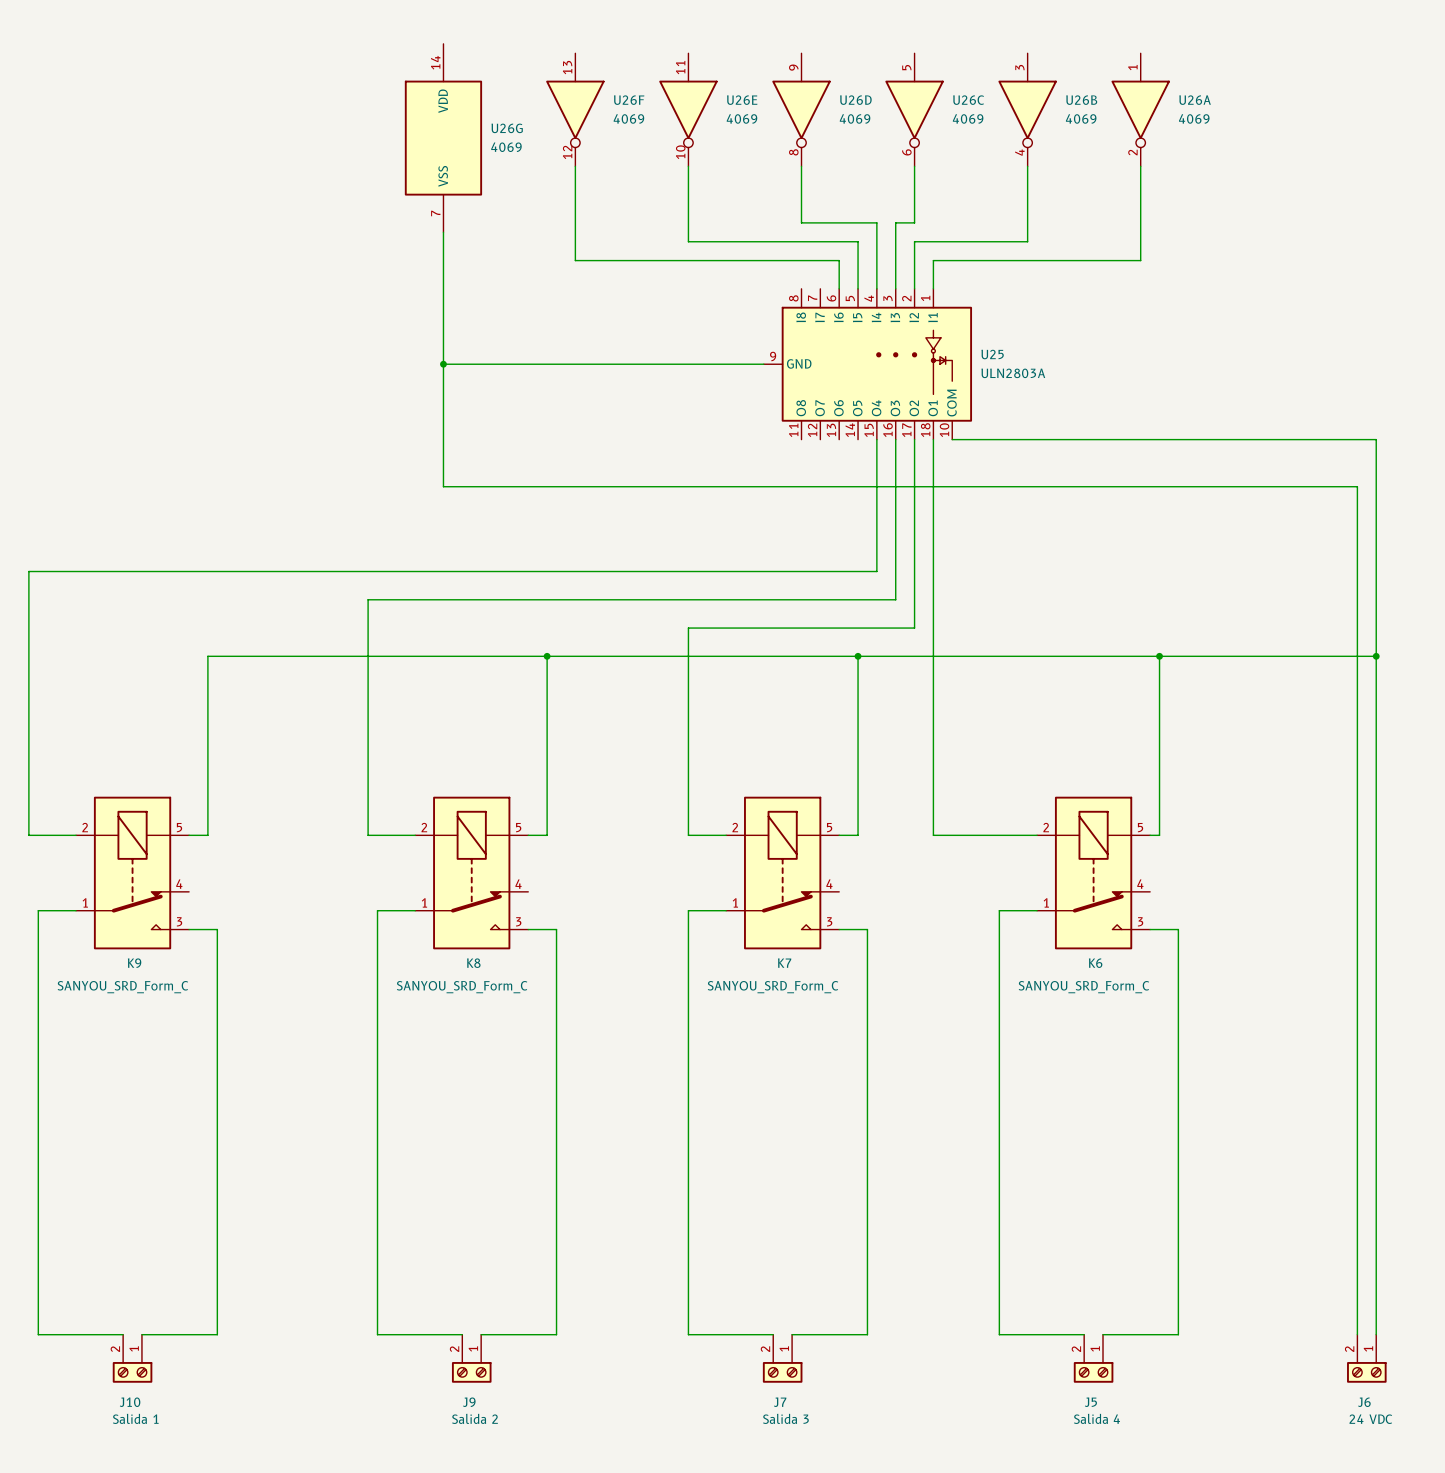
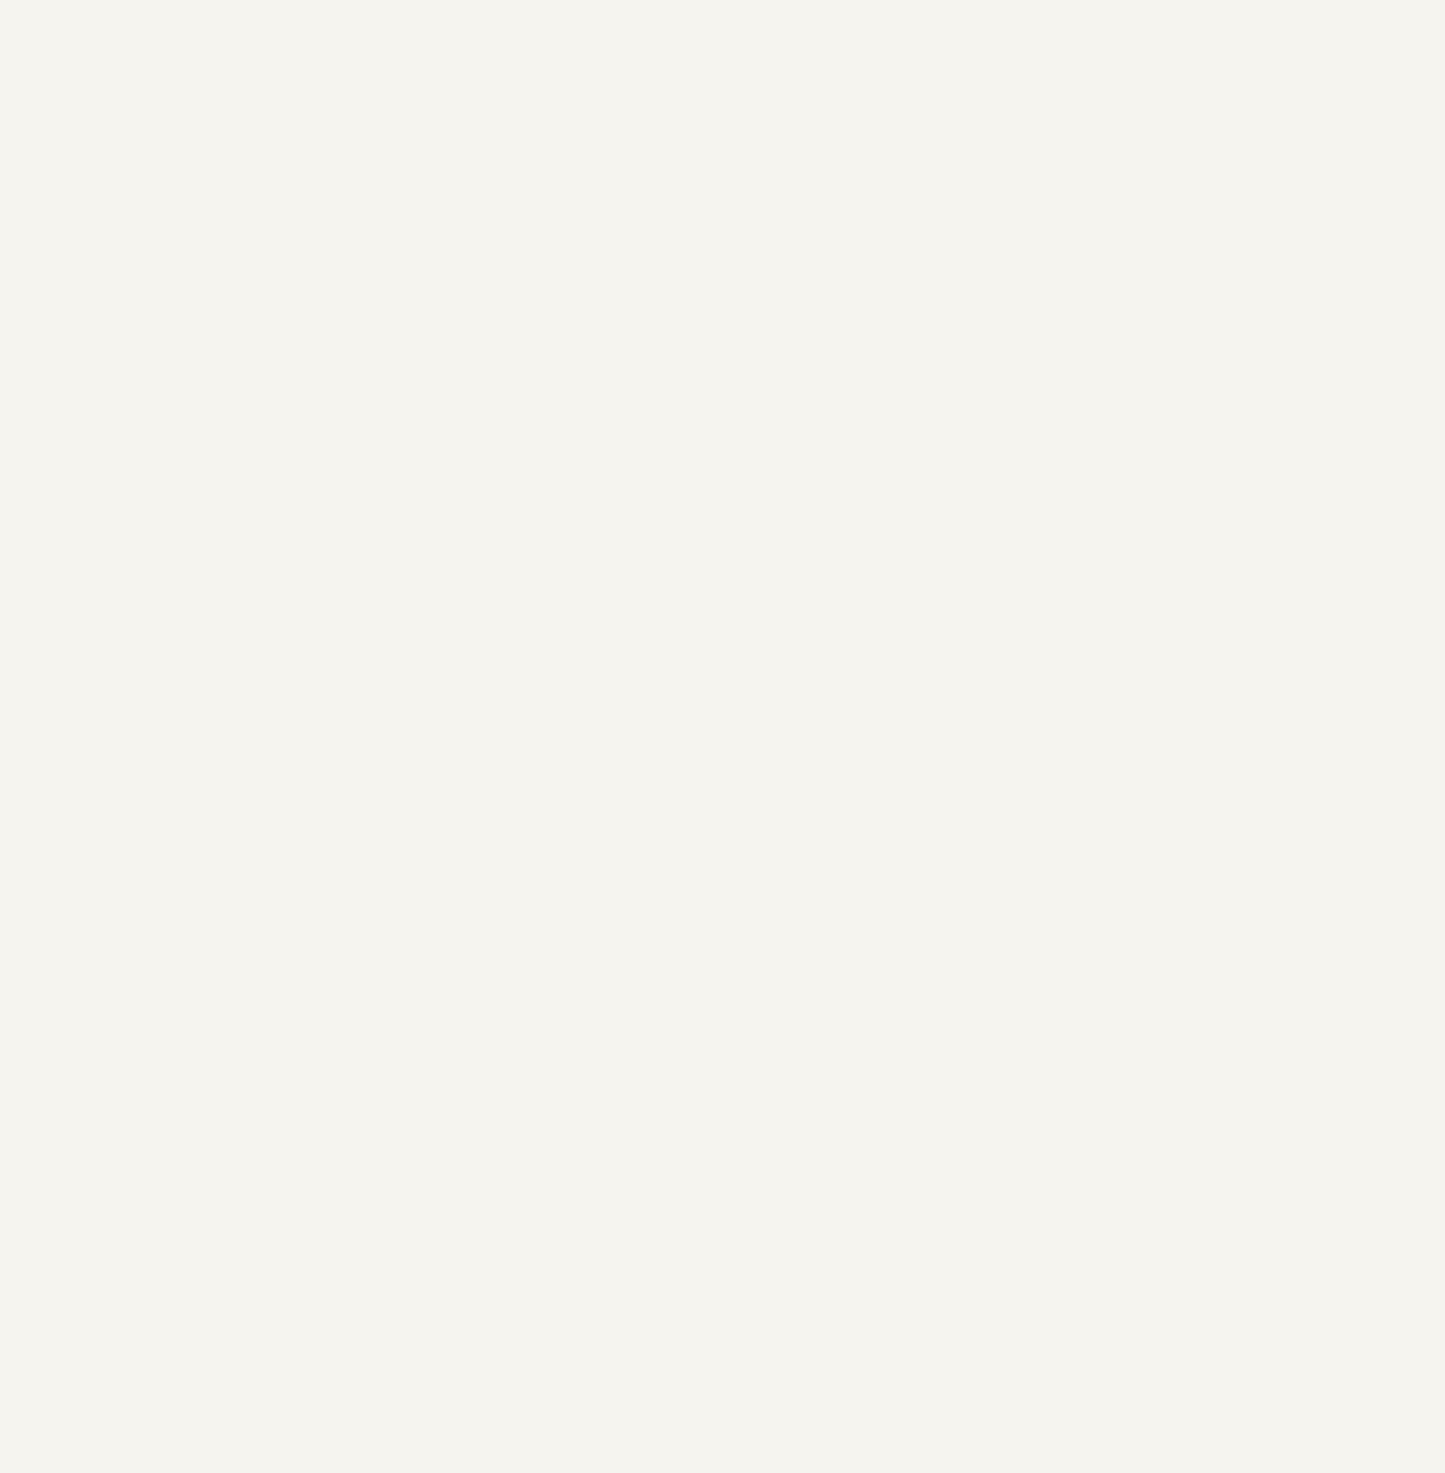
U26F: 4069 (575, 109) -> none
U26E: 4069 (688, 109) -> none
U26D: 4069 (801, 109) -> none
U26C: 4069 (914, 109) -> none
U26B: 4069 (1027, 109) -> none
U26A: 4069 (1140, 109) -> none
U26G: 4069 (443, 138) -> none
wire: (575, 166) (575, 260) (839, 260) (839, 288) -> none
wire: (688, 166) (688, 241) (858, 241) (858, 288) -> none
wire: (801, 166) (801, 222) (876, 222) (876, 288) -> none
wire: (914, 166) (914, 222) (895, 222) (895, 288) -> none
wire: (1027, 166) (1027, 241) (914, 241) (914, 288) -> none
wire: (1140, 166) (1140, 260) (933, 260) (933, 288) -> none
wire: (443, 232) (443, 486) (1357, 486) (1357, 1334) -> none
wire: (443, 364) (763, 364) -> none
junction: (443, 364) -> none
U25: ULN2803A (867, 364) -> none
wire: (876, 439) (876, 571) (28, 571) (28, 835) (76, 835) -> none
wire: (895, 439) (895, 599) (368, 599) (368, 835) (415, 835) -> none
wire: (914, 439) (914, 628) (688, 628) (688, 835) (726, 835) -> none
wire: (933, 439) (933, 835) (1037, 835) -> none
wire: (952, 439) (1376, 439) (1376, 1334) -> none
wire: (547, 656) (547, 835) (528, 835) -> none
junction: (547, 656) -> none
wire: (858, 656) (858, 835) (839, 835) -> none
junction: (858, 656) -> none
wire: (1159, 656) (1159, 835) (1150, 835) -> none
junction: (1159, 656) -> none
wire: (1376, 656) (207, 656) (207, 835) (189, 835) -> none
junction: (1376, 656) -> none
K9: SANYOU_SRD_Form_C (132, 873) -> none
K8: SANYOU_SRD_Form_C (471, 873) -> none
K7: SANYOU_SRD_Form_C (782, 873) -> none
K6: SANYOU_SRD_Form_C (1093, 873) -> none
wire: (76, 910) (38, 910) (38, 1334) (123, 1334) -> none
wire: (415, 910) (377, 910) (377, 1334) (462, 1334) -> none
wire: (726, 910) (688, 910) (688, 1334) (773, 1334) -> none
wire: (1037, 910) (999, 910) (999, 1334) (1084, 1334) -> none
wire: (189, 929) (217, 929) (217, 1334) (141, 1334) -> none
wire: (528, 929) (556, 929) (556, 1334) (481, 1334) -> none
wire: (839, 929) (867, 929) (867, 1334) (792, 1334) -> none
wire: (1150, 929) (1178, 929) (1178, 1334) (1103, 1334) -> none
J10: Salida 1 (132, 1358) -> none
J9: Salida 2 (471, 1358) -> none
J7: Salida 3 (782, 1358) -> none
J5: Salida 4 (1093, 1358) -> none
J6: 24 VDC (1366, 1358) -> none

